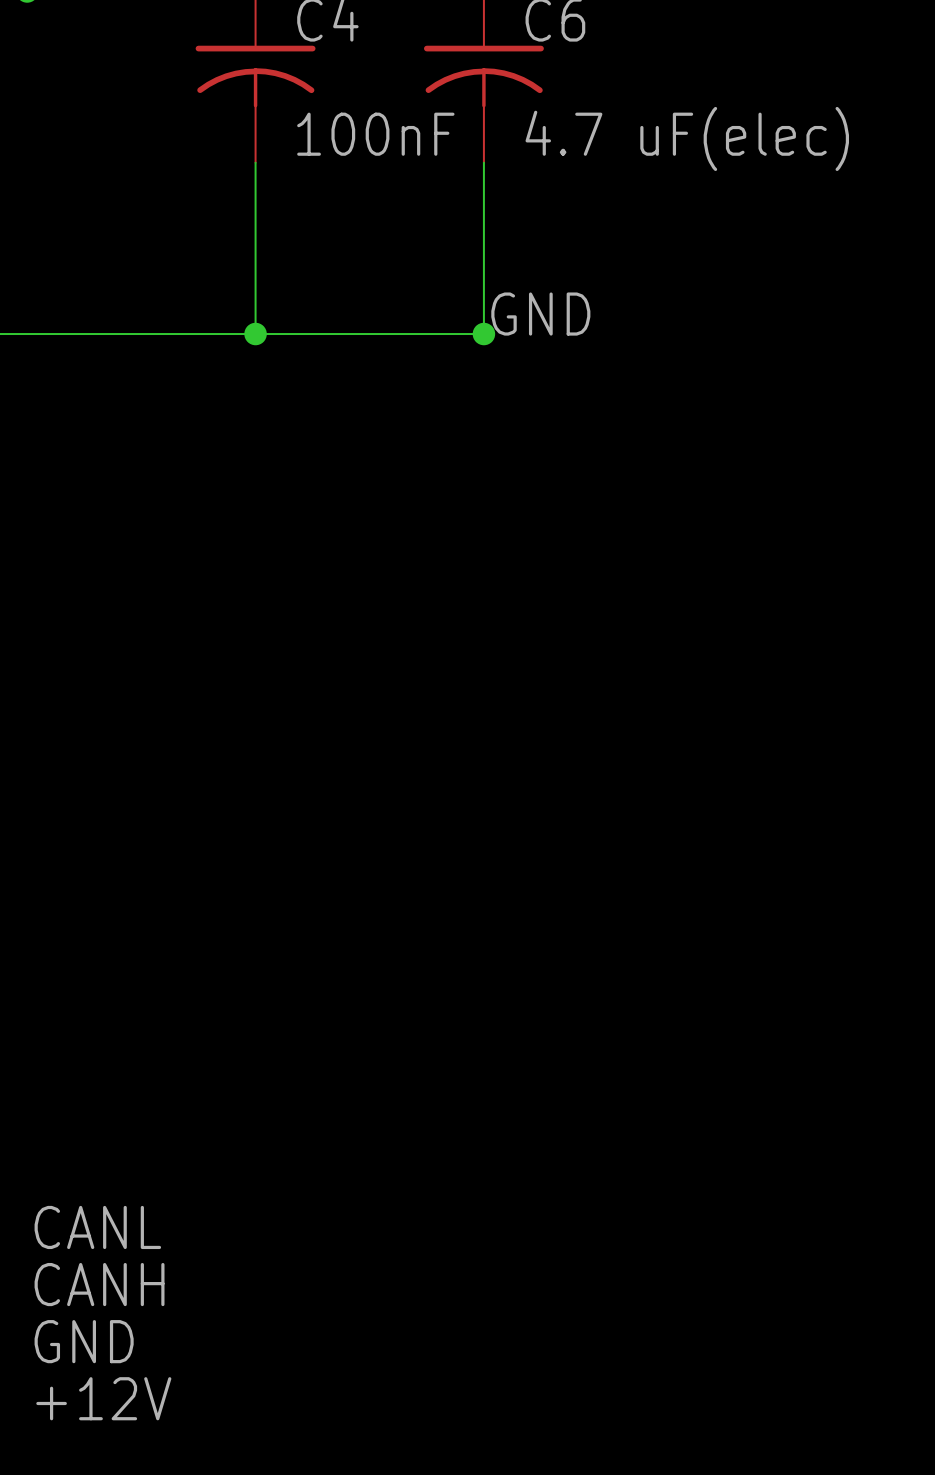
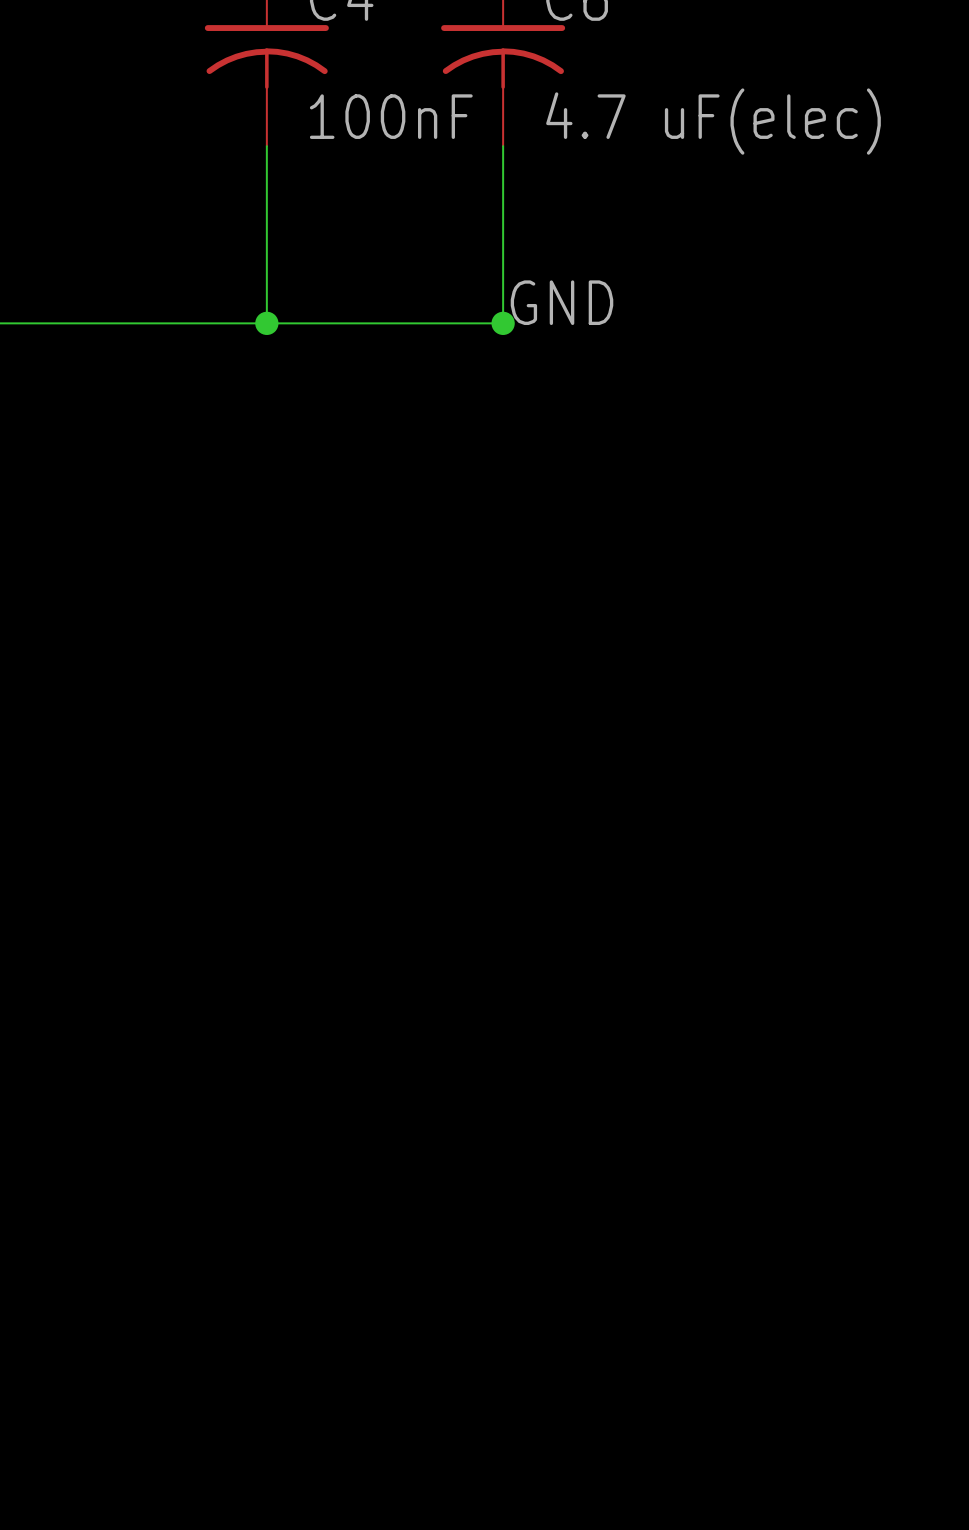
label: CANL (97, 1227) -> none
label: CANH (99, 1284) -> none
label: GND (84, 1341) -> none
label: +12V (103, 1398) -> none

